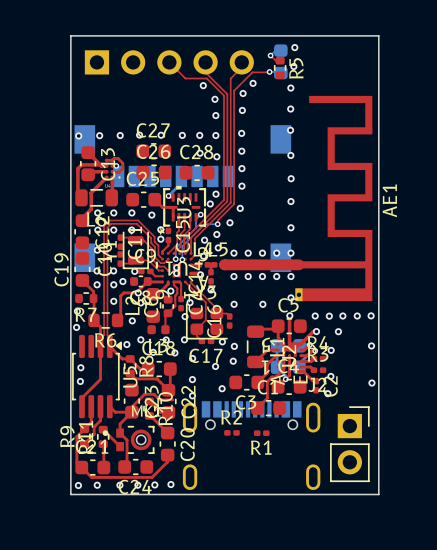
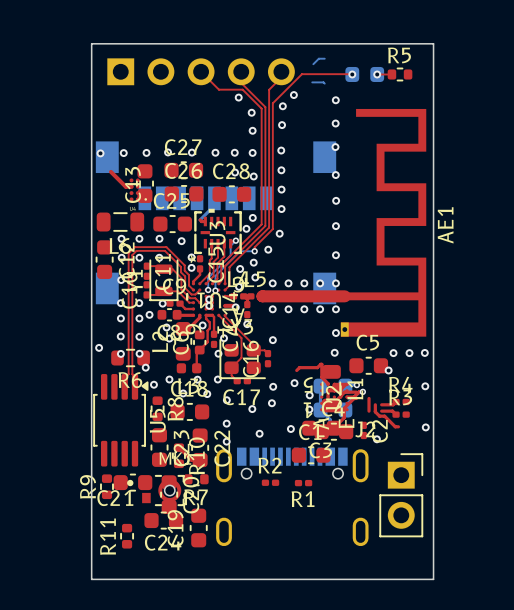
board edge: (70, 35) (378, 35) (378, 494) (70, 494) (70, 35) -> (91, 43) (91, 579) (433, 579) (433, 43) (91, 43)
via: (294, 47) -> none
top track: (270, 55) (275, 60) (280, 60) -> none
via: (270, 55) -> none
part rotation: 0° (280, 61) -> 90° clockwise (364, 74)
part position: (280, 61) -> (364, 74)
via: none -> (352, 74)
top track: none -> (377, 74) (391, 74)
via: none -> (377, 74)
via: (293, 66) -> none
R5 rotation: 0° (280, 67) -> 90° clockwise (400, 74)
R5 position: (280, 67) -> (400, 74)
top track: (269, 71) (252, 72) -> (352, 74) (301, 74) (293, 82)
via: (269, 71) -> none
top track: (106, 160) (118, 158) (122, 163) (122, 168) (119, 172) (112, 171) -> none
C13 position: (88, 163) -> (144, 183)
top track: (100, 164) (81, 164) (77, 168) (77, 194) (81, 197) -> none
via: (116, 165) -> none
top track: (106, 171) (91, 171) (88, 174) -> none
top track: (106, 177) (91, 192) (91, 209) (82, 218) (82, 220) -> none
top track: (112, 177) (111, 197) -> none
via: (168, 195) -> none
top track: (154, 199) (162, 207) (173, 207) (173, 217) -> none
C19 position: (82, 269) -> (198, 527)
top track: (82, 280) (93, 291) (94, 320) (100, 326) (100, 379) (81, 397) (81, 406) -> none
top track: (147, 281) (138, 292) (123, 292) (120, 295) (120, 317) (117, 320) -> none
R7 position: (86, 298) -> (196, 479)
via: none -> (120, 336)
via: (262, 304) -> none
top track: (289, 315) (289, 344) (300, 344) (313, 331) (316, 331) -> none
via: none -> (120, 353)
via: none -> (139, 353)
via: (315, 316) -> none
via: (329, 316) -> none
via: (132, 320) -> none
C5 position: (289, 326) -> (368, 365)
via: (76, 327) -> none
via: none -> (145, 367)
via: (316, 331) -> none
via: (222, 341) -> none
via: none -> (294, 383)
top track: (309, 344) (304, 349) (300, 349) -> none
top track: (109, 346) (122, 358) (130, 358) (140, 369) (148, 369) -> none
L1 position: (255, 346) -> (331, 388)
top track: (278, 349) (267, 349) (255, 361) -> (356, 392) (344, 392) (331, 405)
via: (331, 350) -> none
via: none -> (309, 395)
top track: (278, 355) (267, 364) (267, 373) (257, 382) -> (356, 398) (344, 408) (344, 417) (333, 428)
top track: (289, 355) (289, 375) (278, 386) -> none
top track: none -> (369, 398) (369, 411)
top track: (313, 358) (311, 361) (300, 361) -> (396, 401) (393, 404) (381, 404)
R4 position: (318, 358) -> (401, 401)
top track: (283, 361) (283, 369) (267, 381) (267, 398) (257, 408) -> none
top track: (295, 361) (295, 367) (299, 371) (303, 371) (313, 381) (316, 381) -> (375, 404) (375, 411) (379, 416) (384, 416) (395, 426) (398, 426)
via: none -> (309, 409)
via: (80, 367) -> none
top track: (300, 367) (310, 367) (313, 370) -> (381, 411) (392, 411) (396, 414)
top track: (170, 369) (170, 388) (168, 390) (157, 378) (135, 378) (130, 373) -> none
R3 position: (318, 370) -> (401, 414)
via: (330, 376) -> none
via: (285, 379) -> none
via: (80, 381) -> none
C3 position: (246, 382) -> (321, 428)
via: none -> (290, 429)
top track: (172, 399) (159, 399) (154, 394) (144, 394) (131, 407) (131, 412) -> none
top track: (91, 406) (91, 422) (76, 436) (76, 462) (91, 477) (152, 477) (167, 461) (167, 455) -> none
top track: (100, 406) (100, 420) (94, 427) (94, 434) (84, 443) -> none
top track: (109, 406) (115, 412) (131, 412) -> none
top track: (131, 412) (120, 423) (120, 433) (127, 440) (127, 464) (124, 466) -> none
top track: (149, 415) (167, 432) -> none
top track: (103, 429) (120, 446) -> none
R11 position: (103, 436) -> (127, 536)
top track: (103, 444) (103, 467) -> none
C20 position: (167, 444) -> (169, 494)
C21 position: (92, 467) -> (132, 482)
via: (154, 484) -> none
via: (170, 484) -> none
via: (78, 485) -> none
via: (97, 485) -> none
via: (119, 485) -> none
via: (137, 485) -> none

